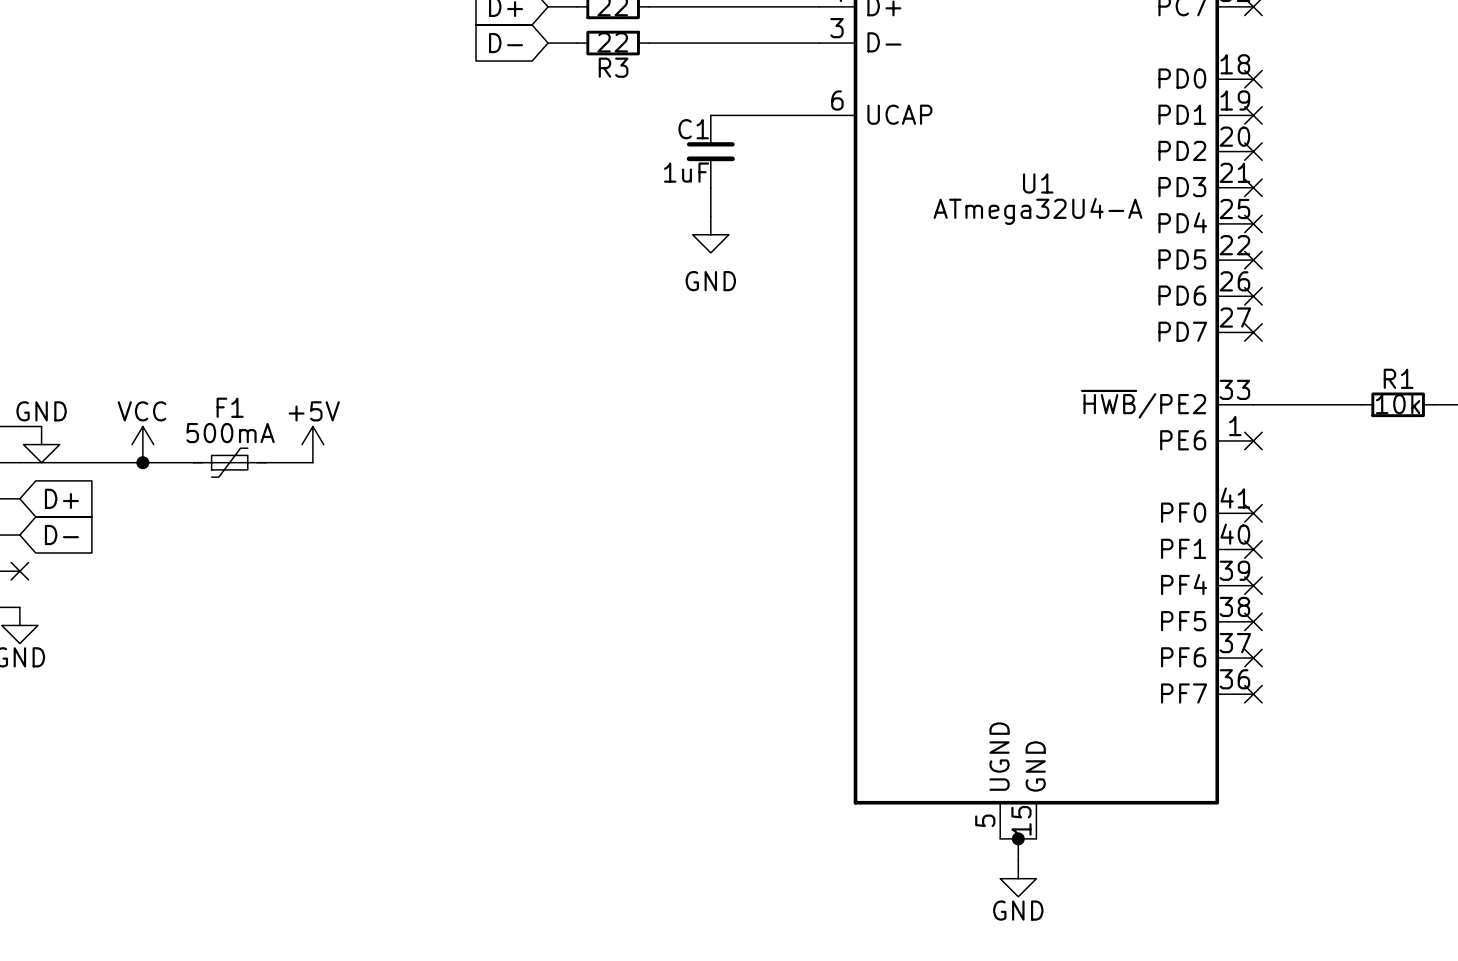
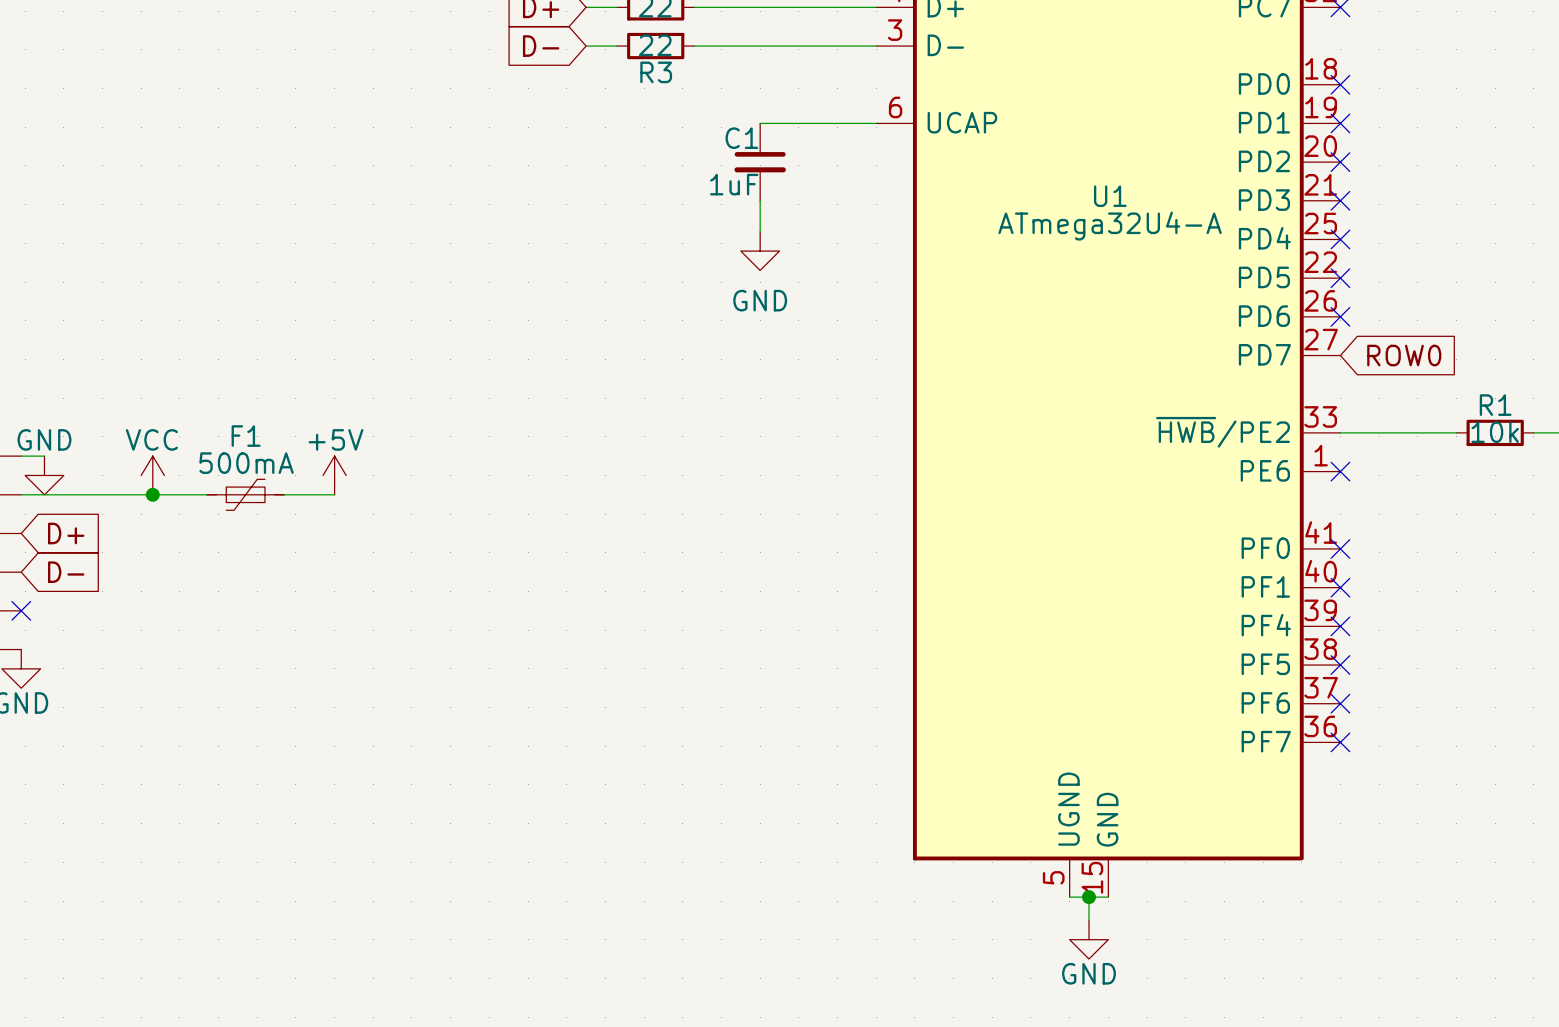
no-connect mark: (1253, 332) -> none
global label: none -> ROW0 (1404, 355)

